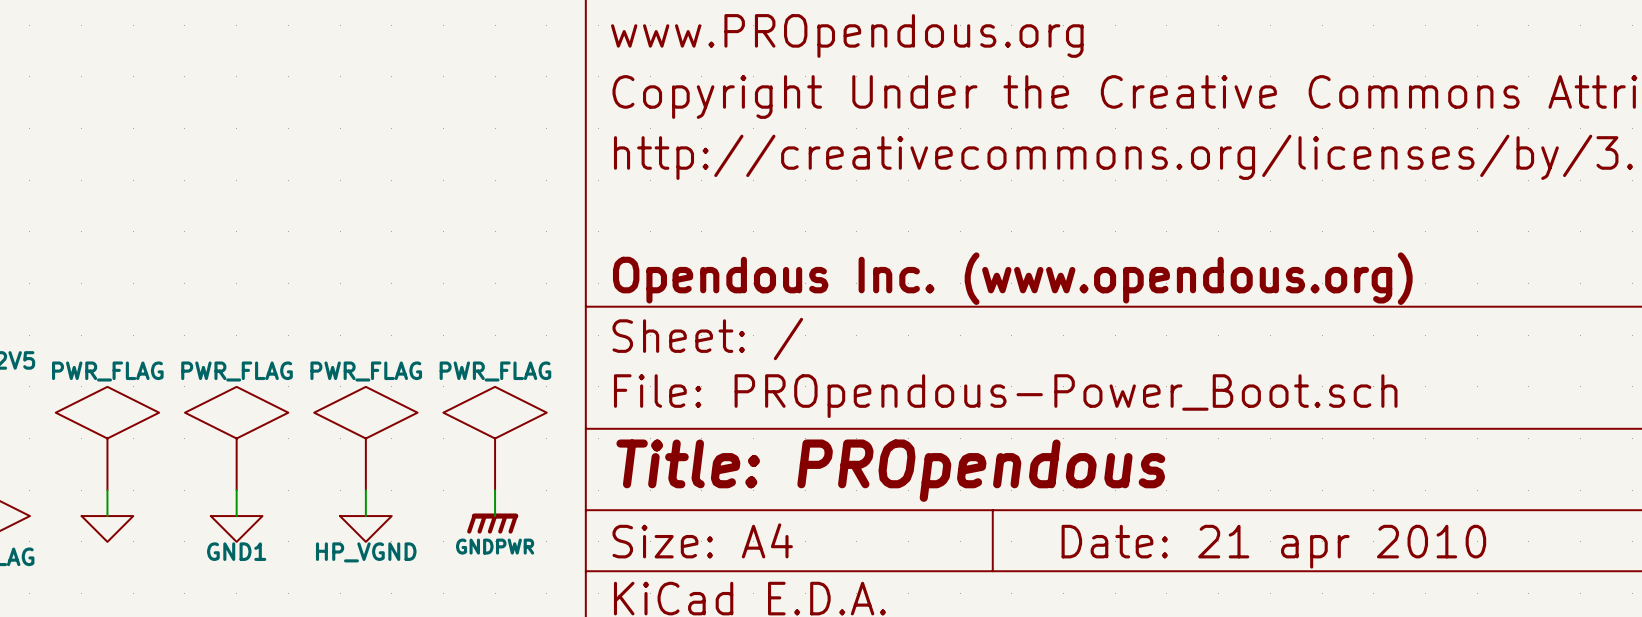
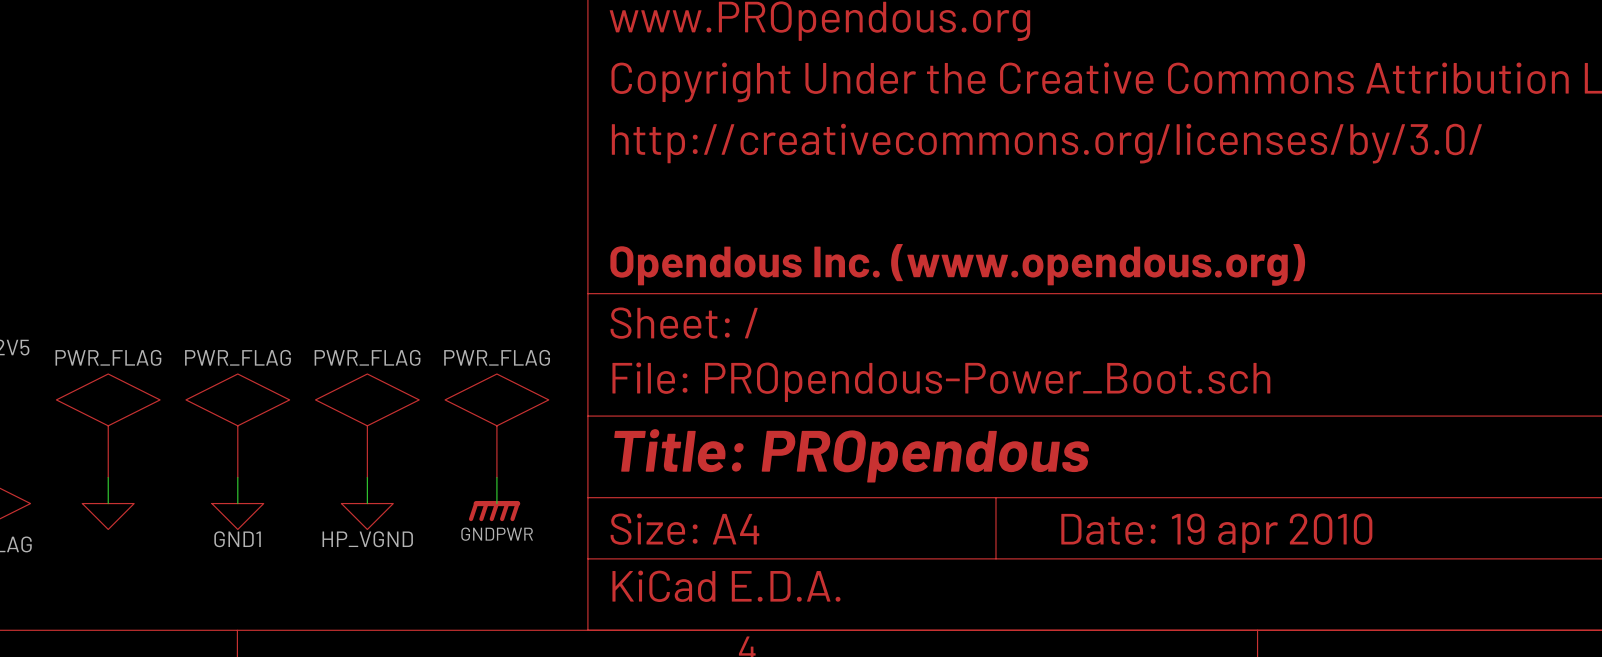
title block: Date: 21 apr 2010 (1273, 546) -> Date: 19 apr 2010 (1216, 533)

